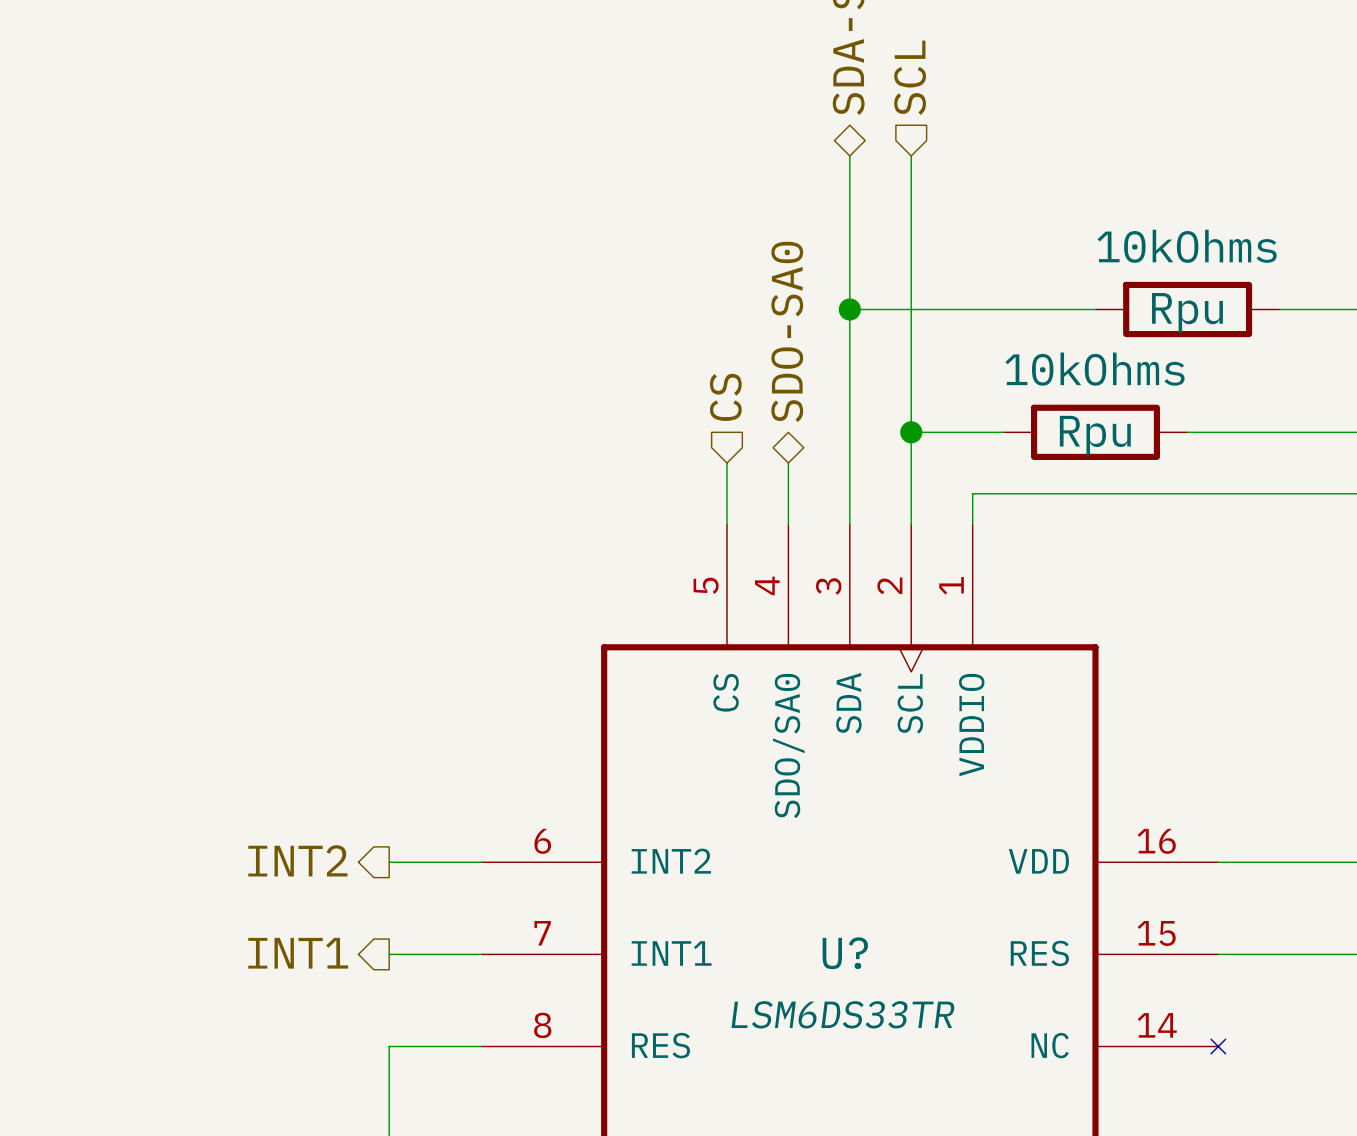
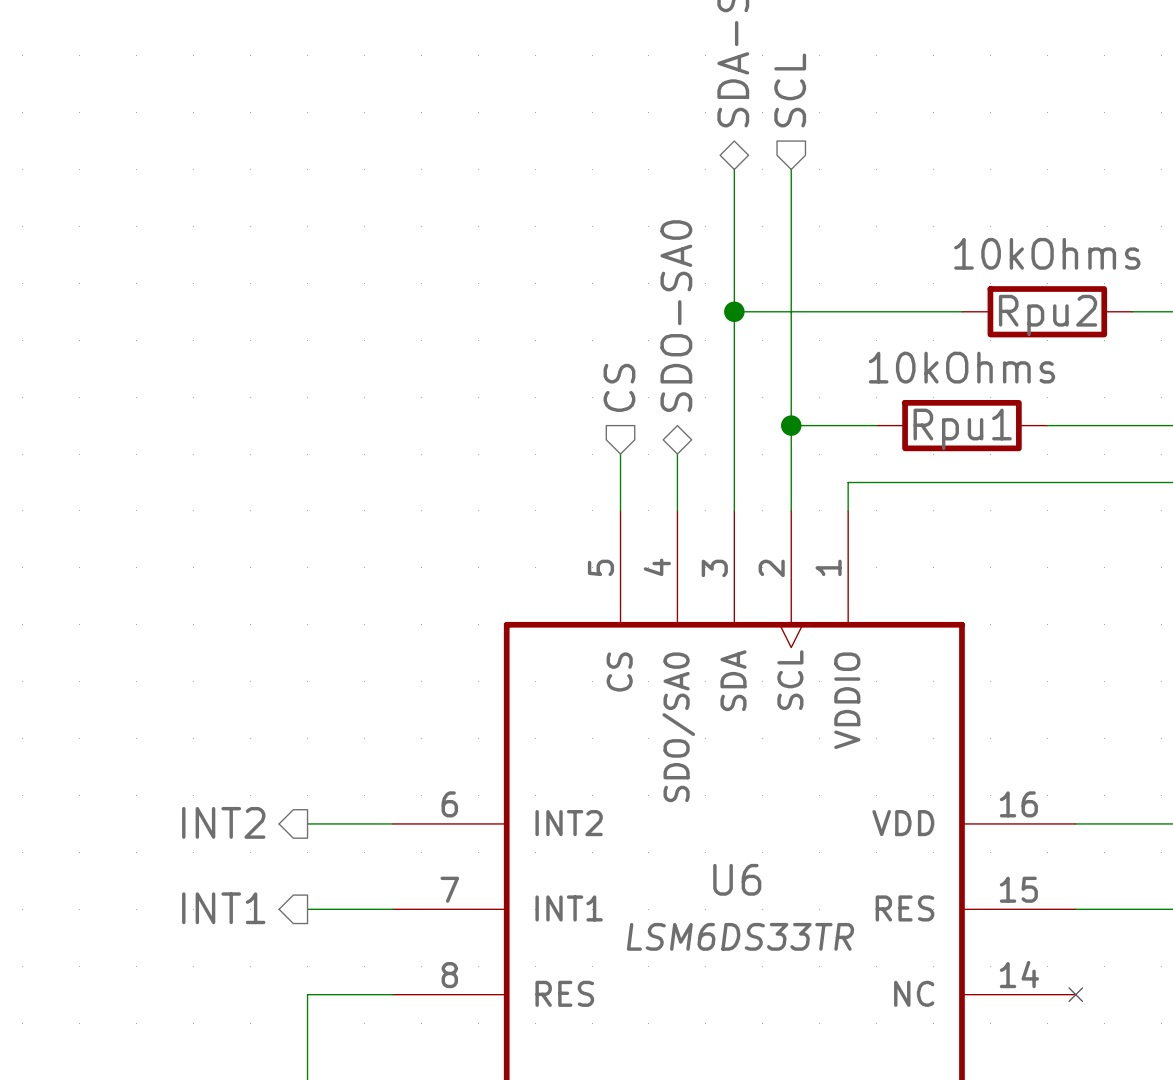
Rpu name: Rpu (1187, 312) -> Rpu2 (1048, 315)
Rpu name: Rpu (1095, 435) -> Rpu1 (962, 429)
U? name: U? (845, 953) -> U6 (737, 879)
U? value position: LSM6DS33TR (843, 1014) -> LSM6DS33TR (740, 936)

